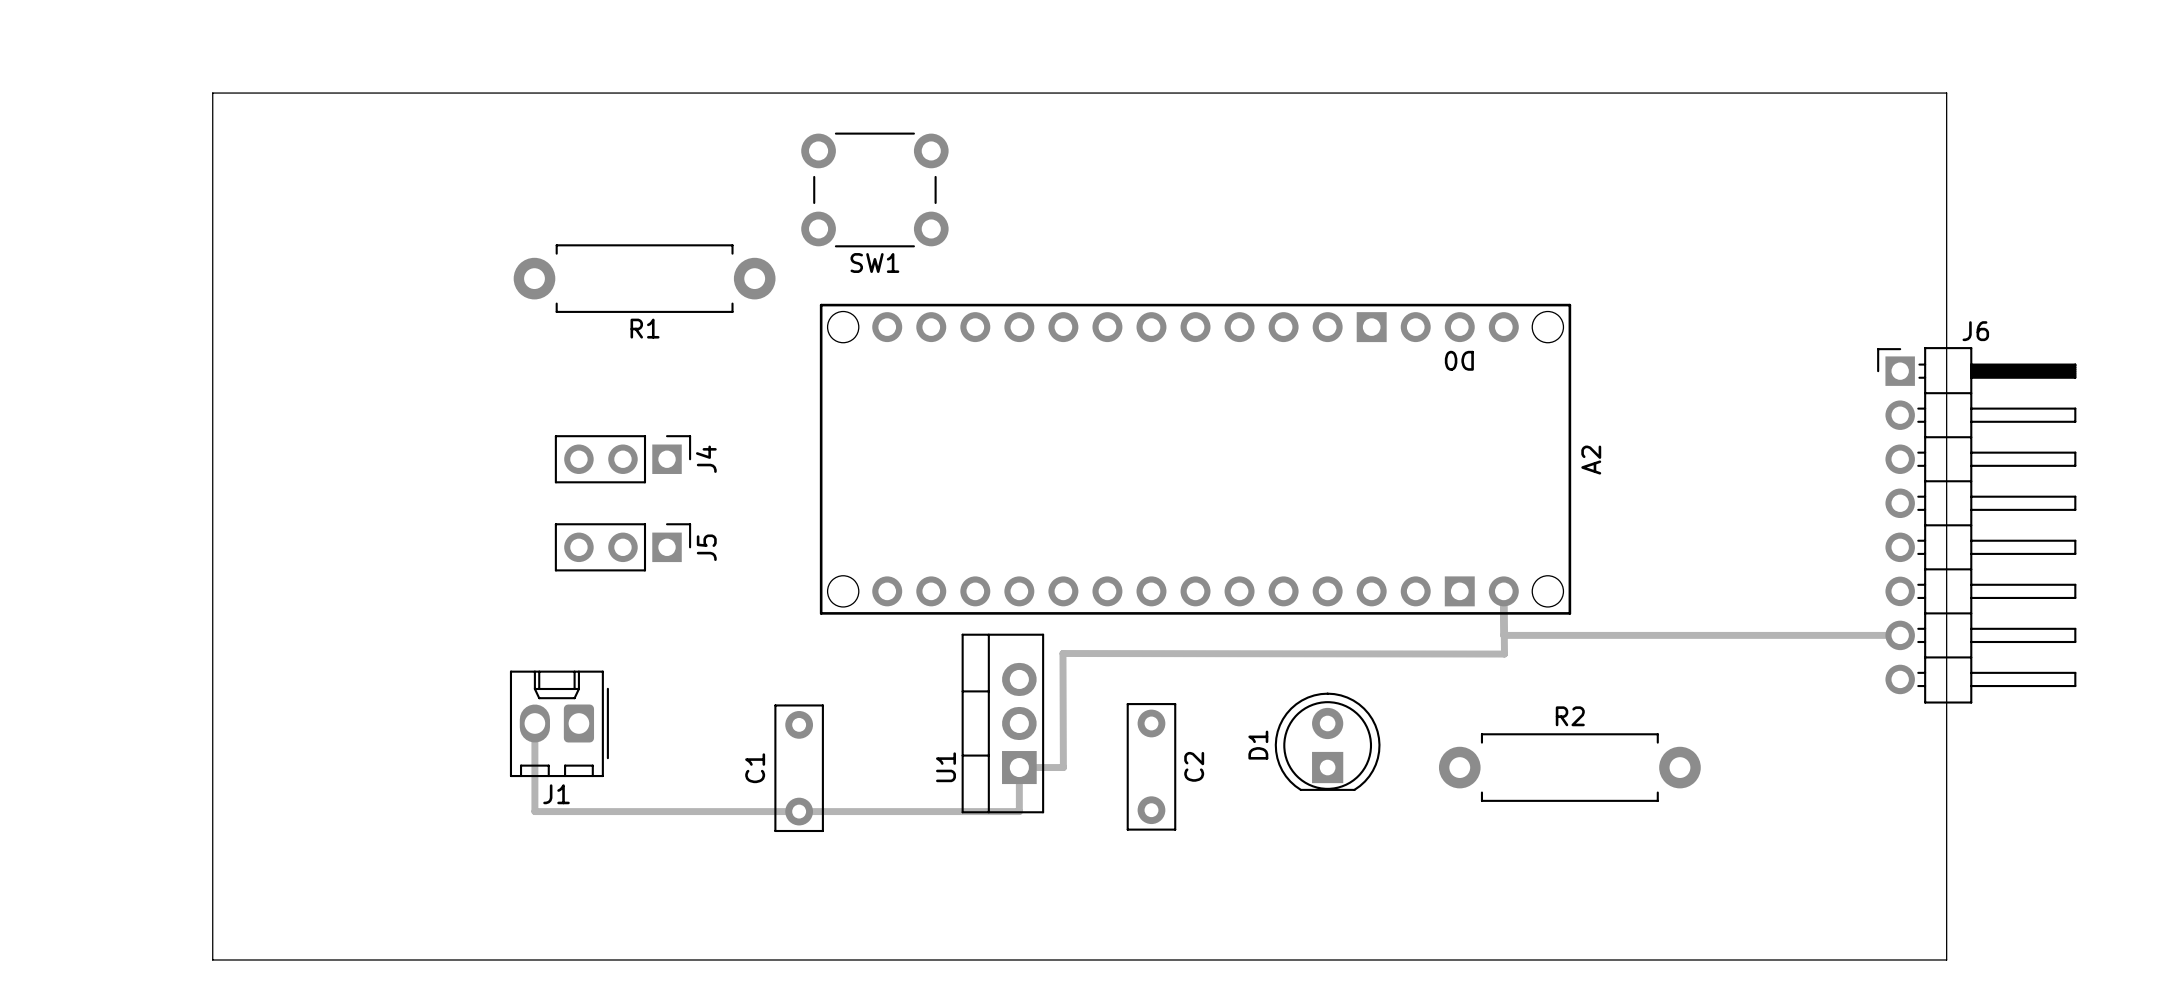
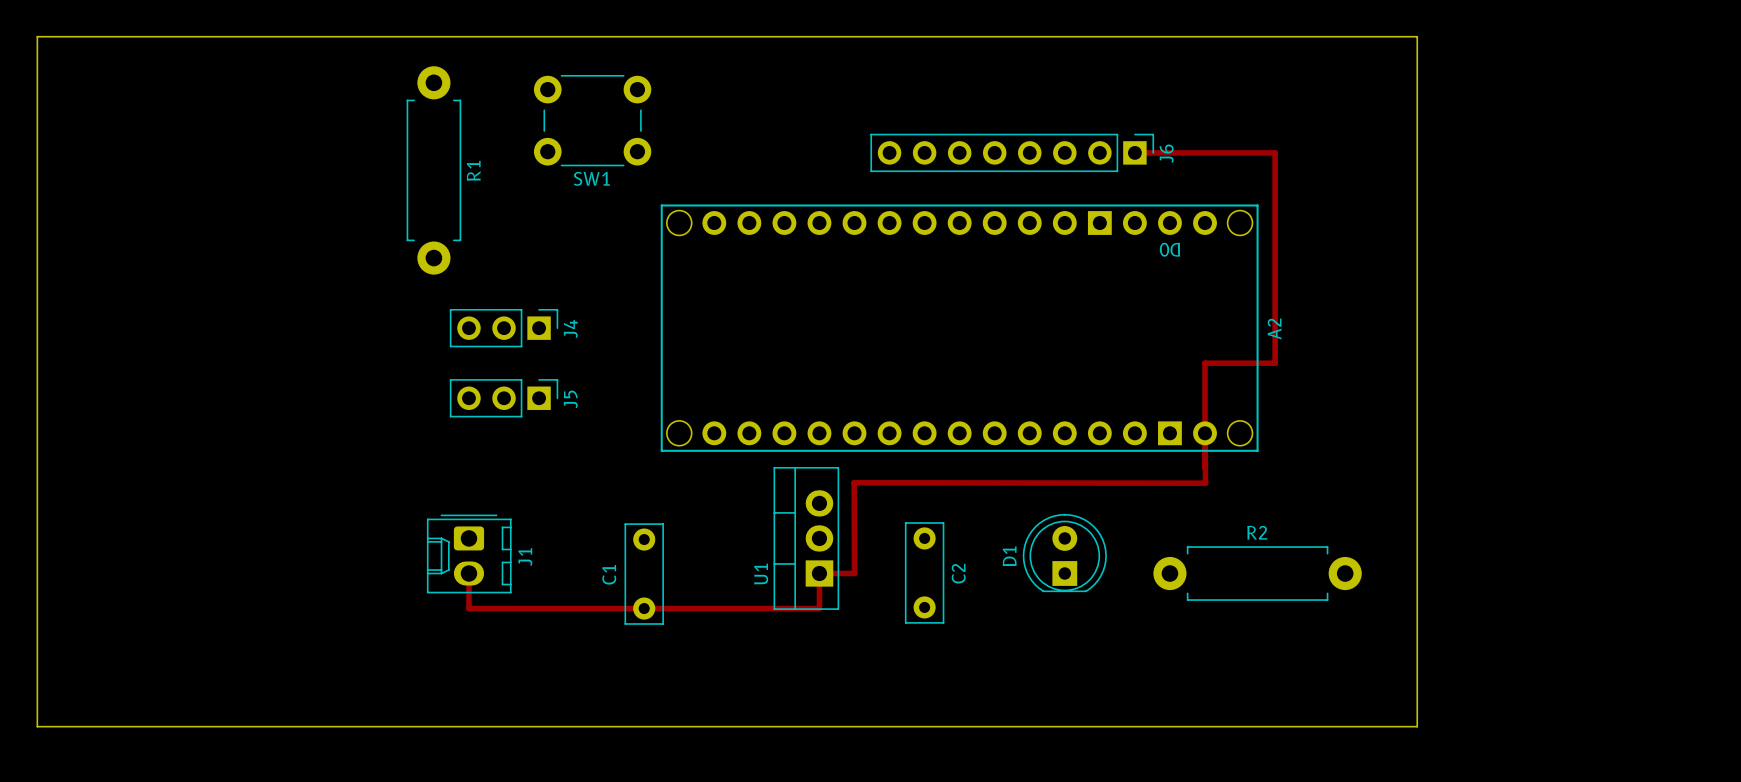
board edge: (212, 93) (212, 960) -> (177, 36) (37, 36) (37, 726) (177, 726)
board edge: (1770, 93) (1946, 93) (1946, 960) (1770, 960) -> (1417, 36) (1417, 726)
SW1 position: (874, 189) -> (592, 120)
track: none -> (1134, 152) (1275, 152) (1275, 363) (1205, 363) (1205, 433)
R1 rotation: 0° (644, 278) -> 90° clockwise (433, 170)
R1 name position: R1 (645, 328) -> R1 (473, 170)
J6 name position: J6 (1975, 331) -> J6 (1166, 153)
J6 footprint: [1877, 347, 2077, 704] -> [870, 133, 1155, 173]
track: (1503, 635) (1900, 635) -> none
track: (534, 723) (534, 811) (578, 811) -> (468, 573) (468, 608)
J1 rotation: 0° (559, 723) -> 90° counterclockwise (469, 553)

